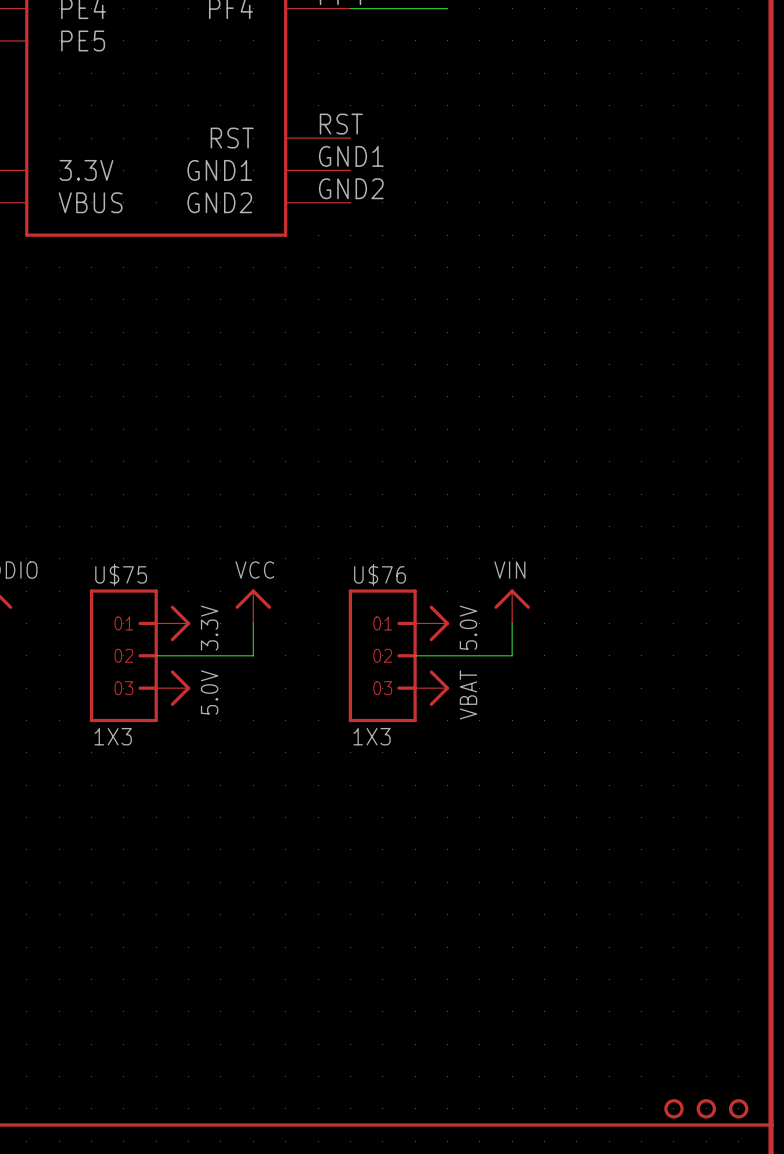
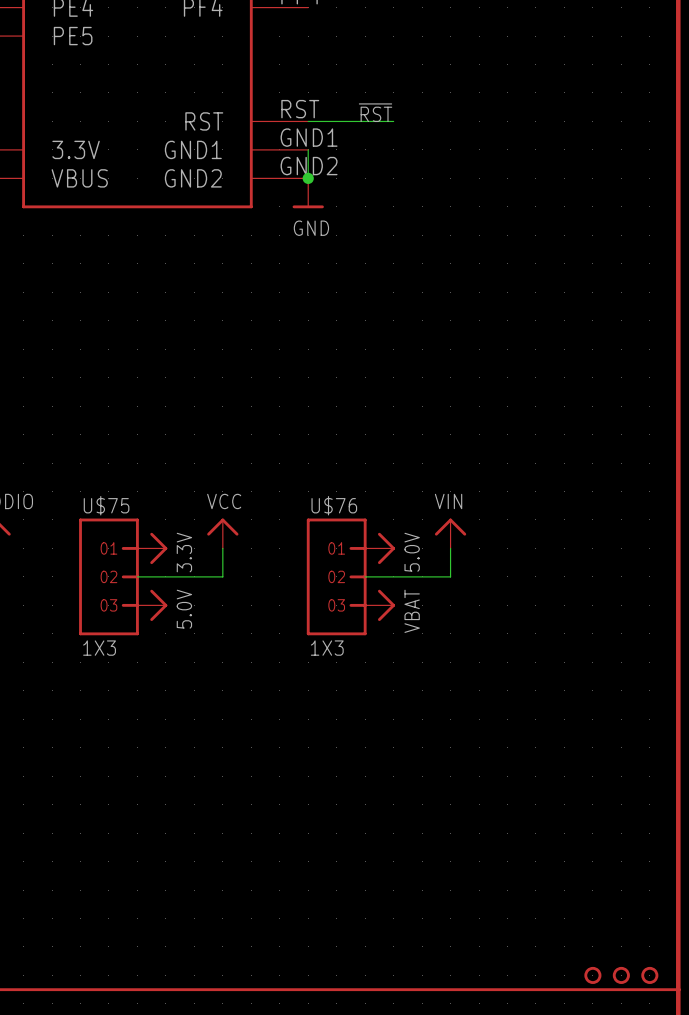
wire: (350, 8) (447, 8) -> (308, 121) (393, 121)
label: none -> ~{RST} (375, 112)
wire: none -> (308, 149) (308, 178)
junction: none -> (308, 178)
power symbol: none -> GND (308, 193)

